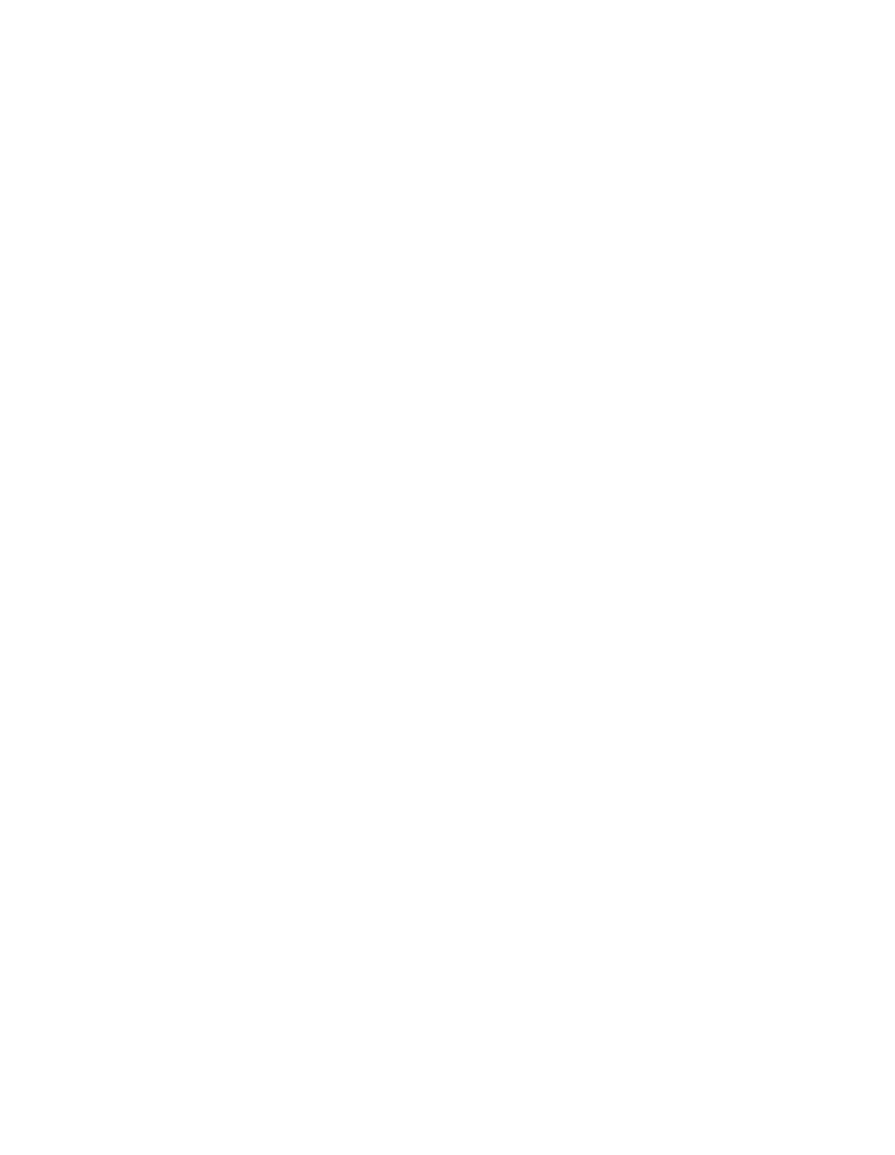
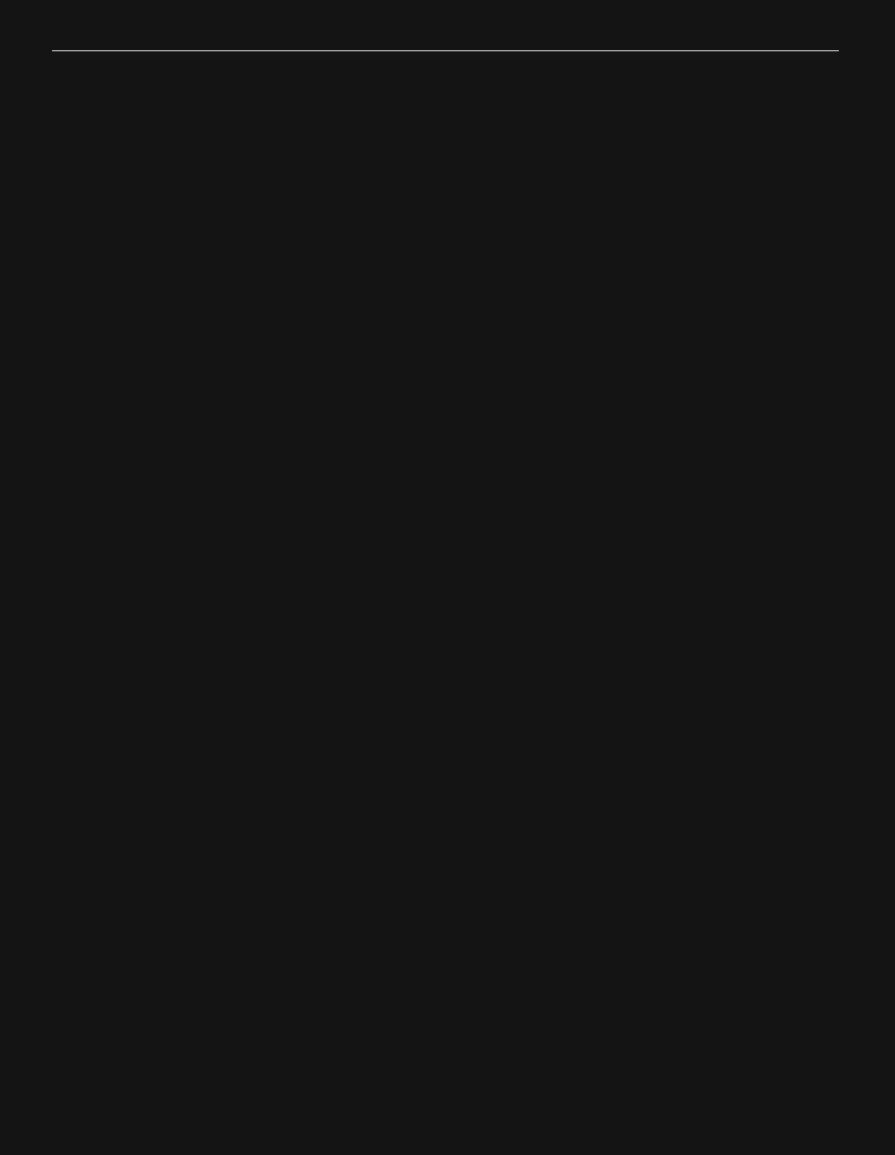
board edge: none -> (52, 50) (838, 50)

